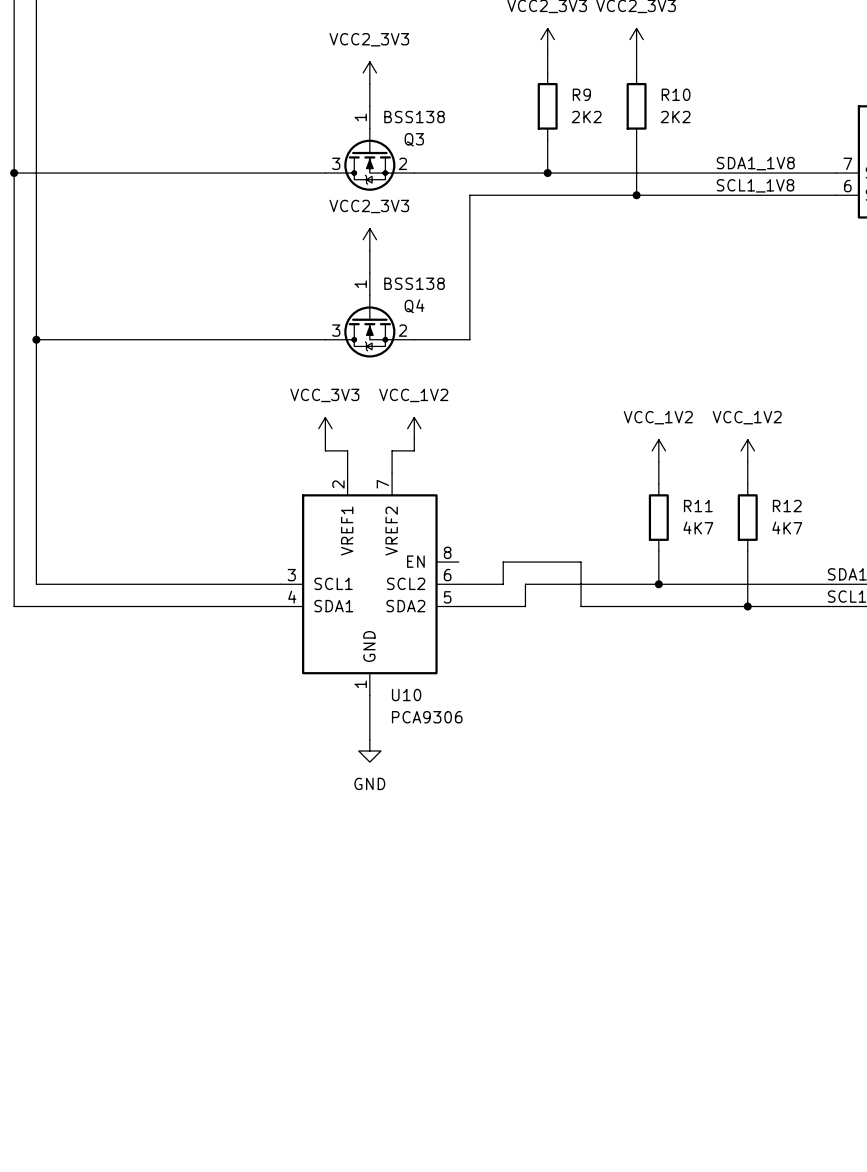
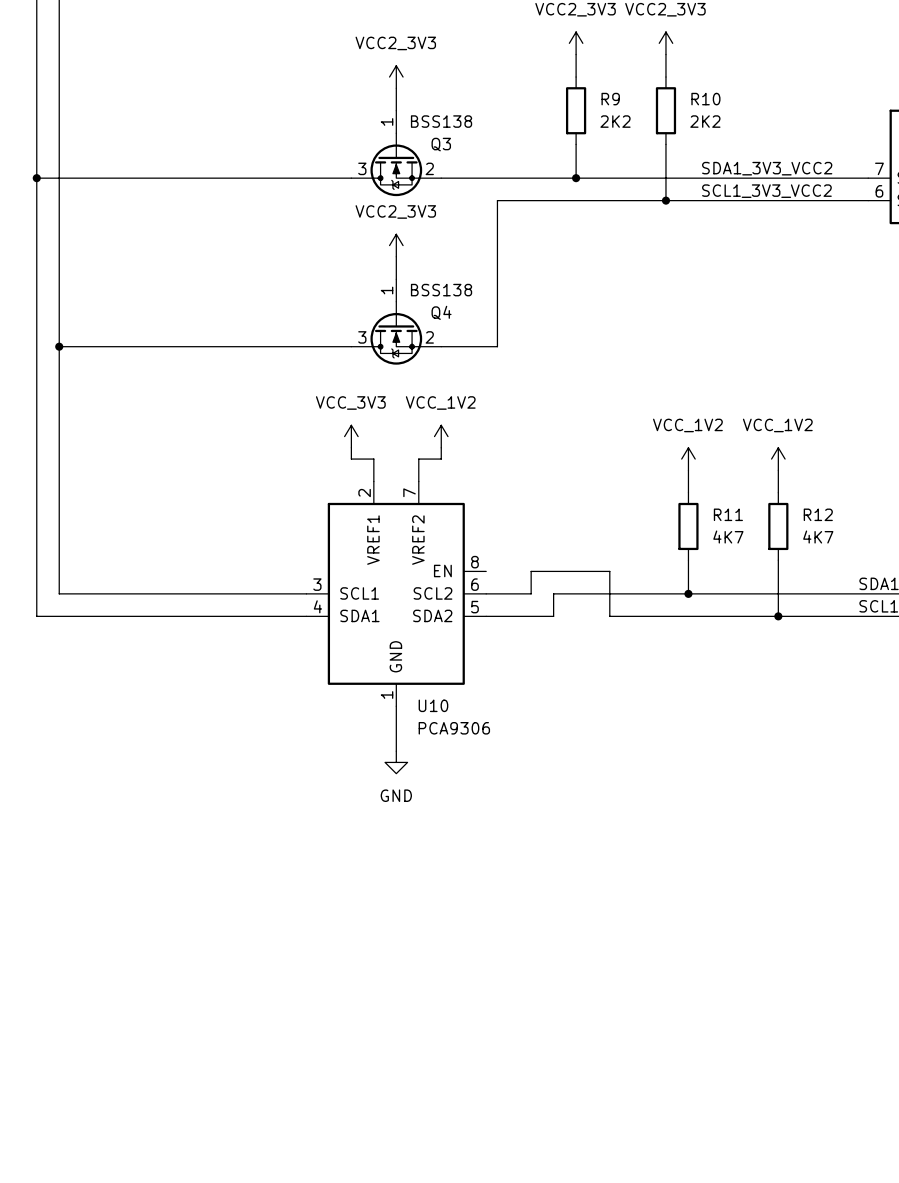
label: none -> SDA1_3V3_VCC2 (767, 168)
label: SDA1_1V8 (755, 163) -> none
label: none -> SCL1_3V3_VCC2 (766, 191)
label: SCL1_1V8 (755, 185) -> none

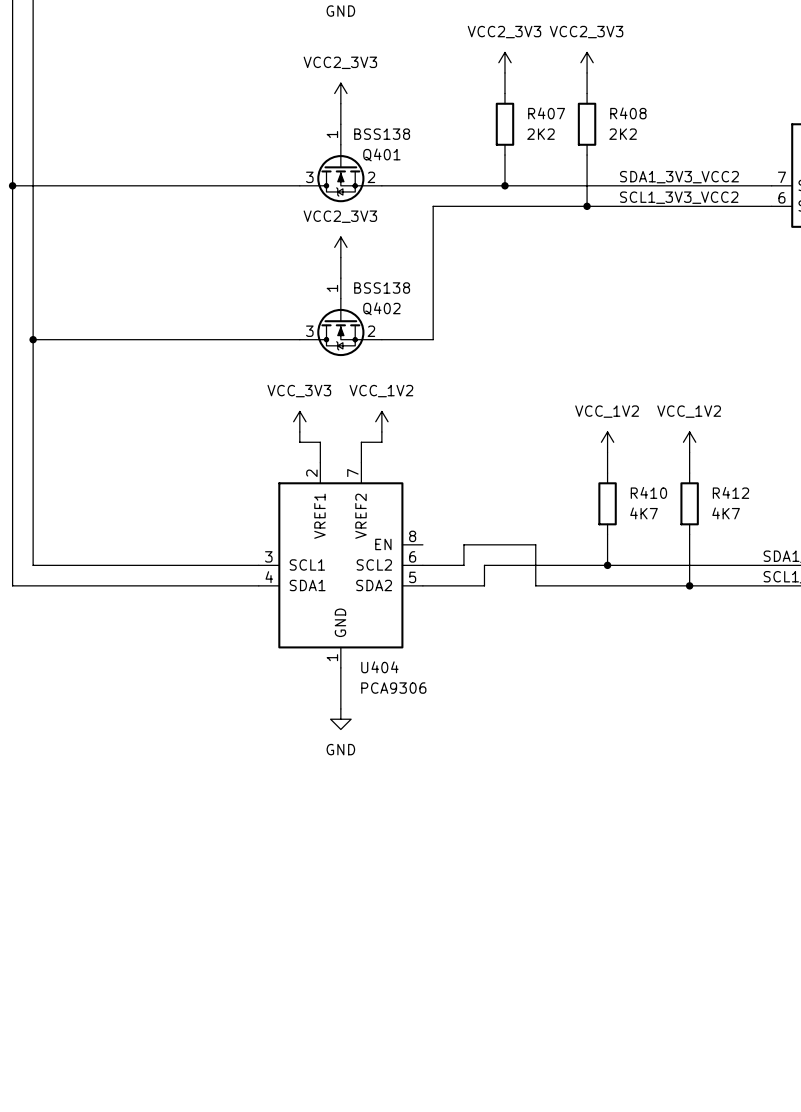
R9 name: R9 (610, 99) -> R407 (546, 113)
R10 name: R10 (705, 99) -> R408 (628, 113)
Q3 name: Q3 (441, 144) -> Q401 (381, 154)
Q4 name: Q4 (441, 312) -> Q402 (381, 308)
R11 name: R11 (728, 514) -> R410 (648, 492)
R12 name: R12 (818, 514) -> R412 (730, 492)
U10 name: U10 (433, 705) -> U404 (379, 667)

